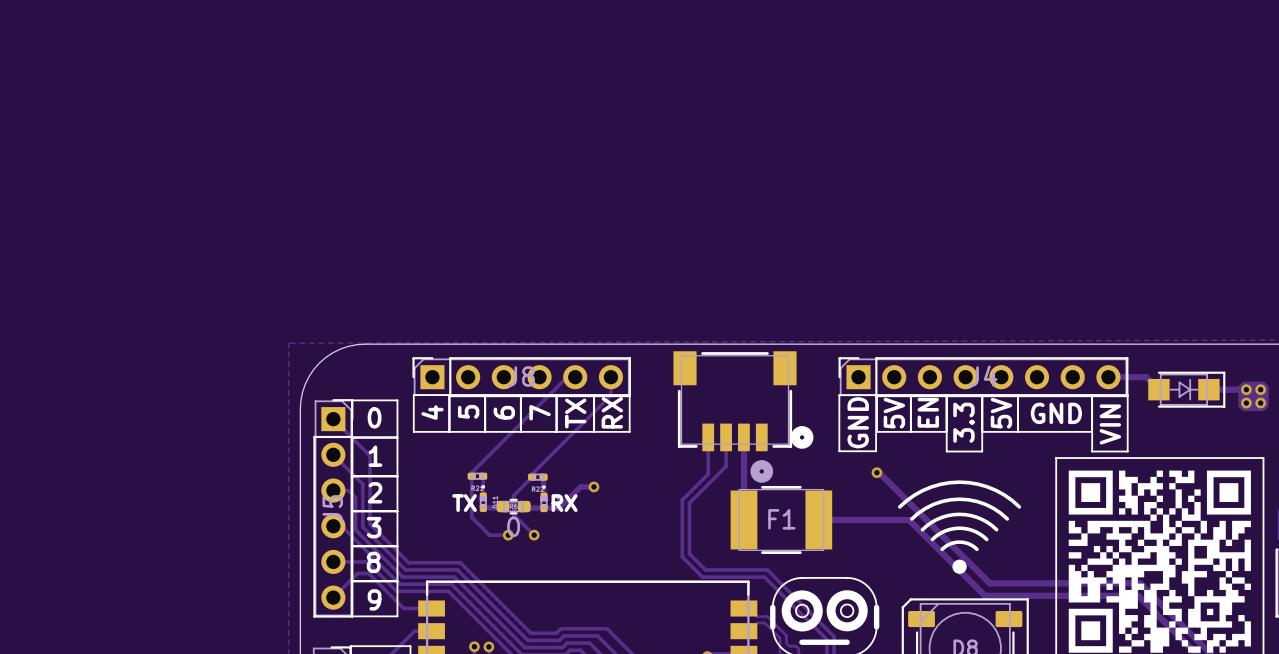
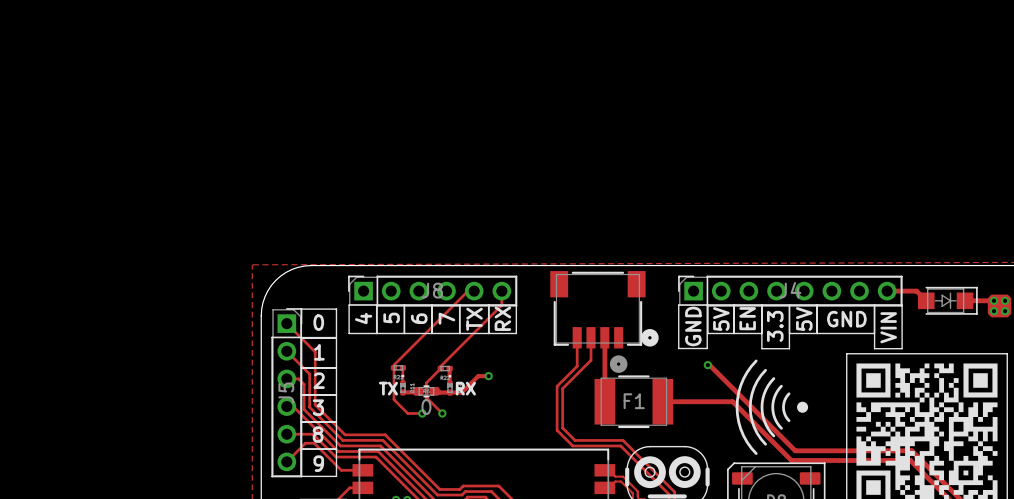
line: none -> (756, 360) (747, 372) (740, 385) (737, 407) (738, 421) (743, 435) (756, 453)
line: none -> (765, 370) (754, 387) (750, 407) (754, 427) (765, 444)
line: none -> (773, 378) (765, 389) (761, 407) (765, 424) (773, 435)
line: none -> (781, 386) (775, 394) (772, 407) (774, 417) (781, 428)
line: (899, 506) (922, 490) (940, 484) (959, 482) (987, 486) (1004, 495) (1019, 506) -> none
line: none -> (789, 393) (783, 407) (789, 420)
line: (911, 518) (933, 504) (959, 499) (985, 504) (1007, 518) -> none
line: (922, 529) (936, 519) (959, 514) (982, 519) (996, 529) -> none
line: (932, 539) (942, 532) (959, 528) (972, 530) (986, 539) -> none
line: (942, 549) (951, 543) (959, 542) (967, 543) (976, 549) -> none
drawing position: (959, 566) -> (802, 407)

